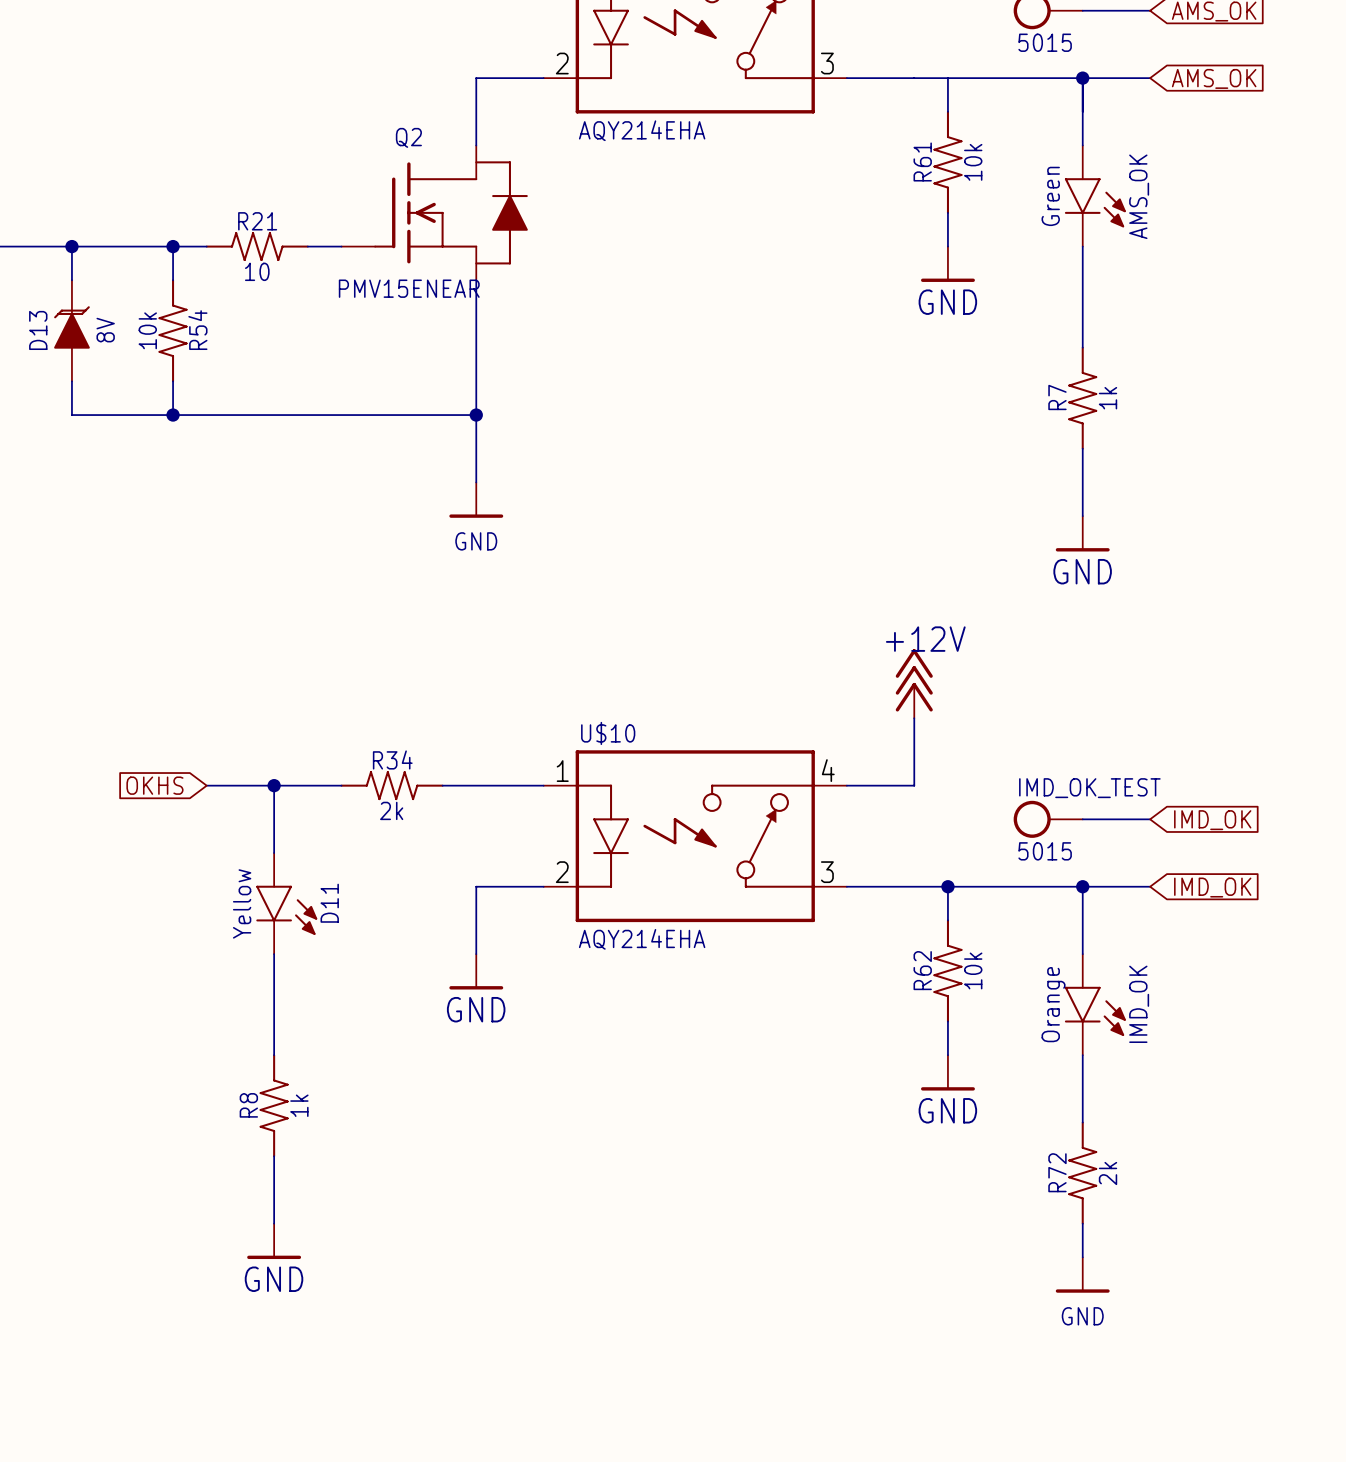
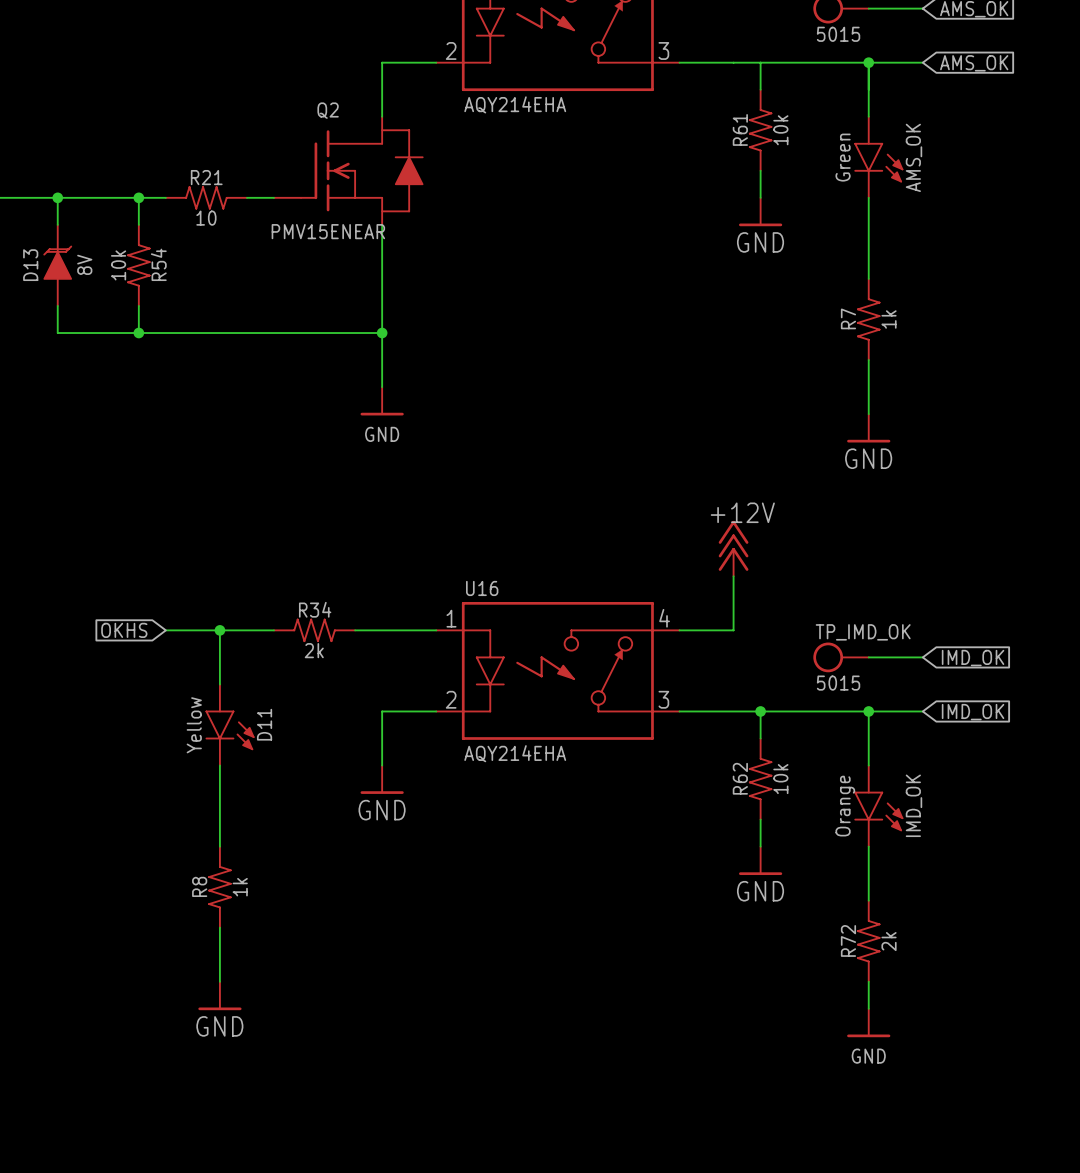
U$10 name: U$10 (608, 733) -> U16 (482, 588)
IMD_OK_TEST name: IMD_OK_TEST (1089, 788) -> TP_IMD_OK (863, 632)

